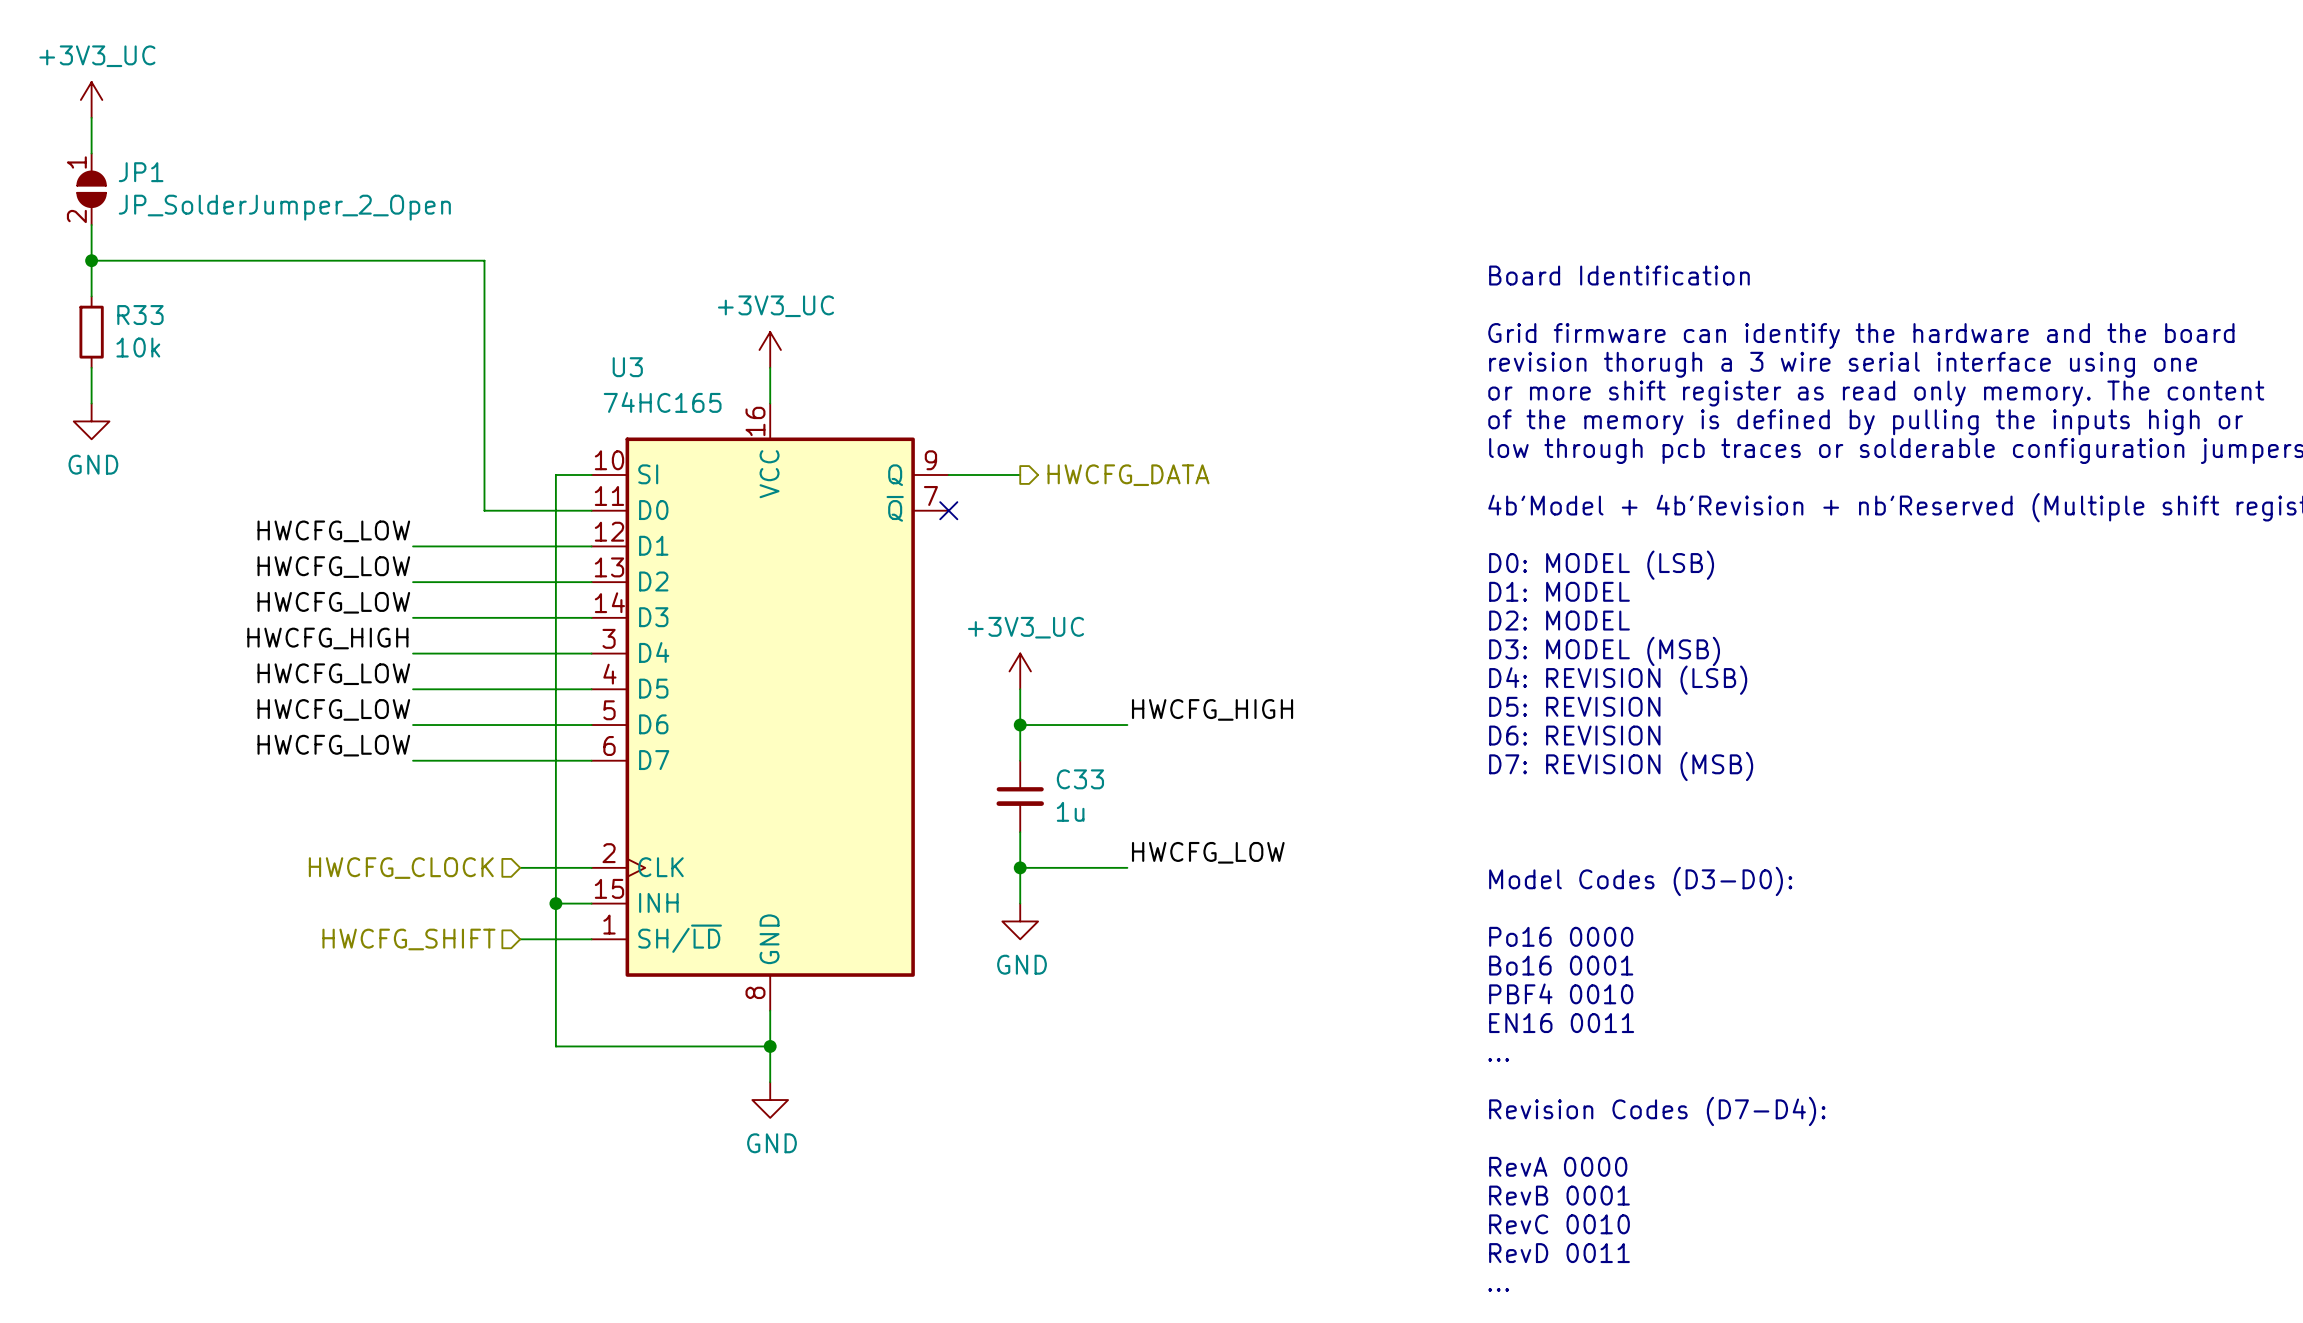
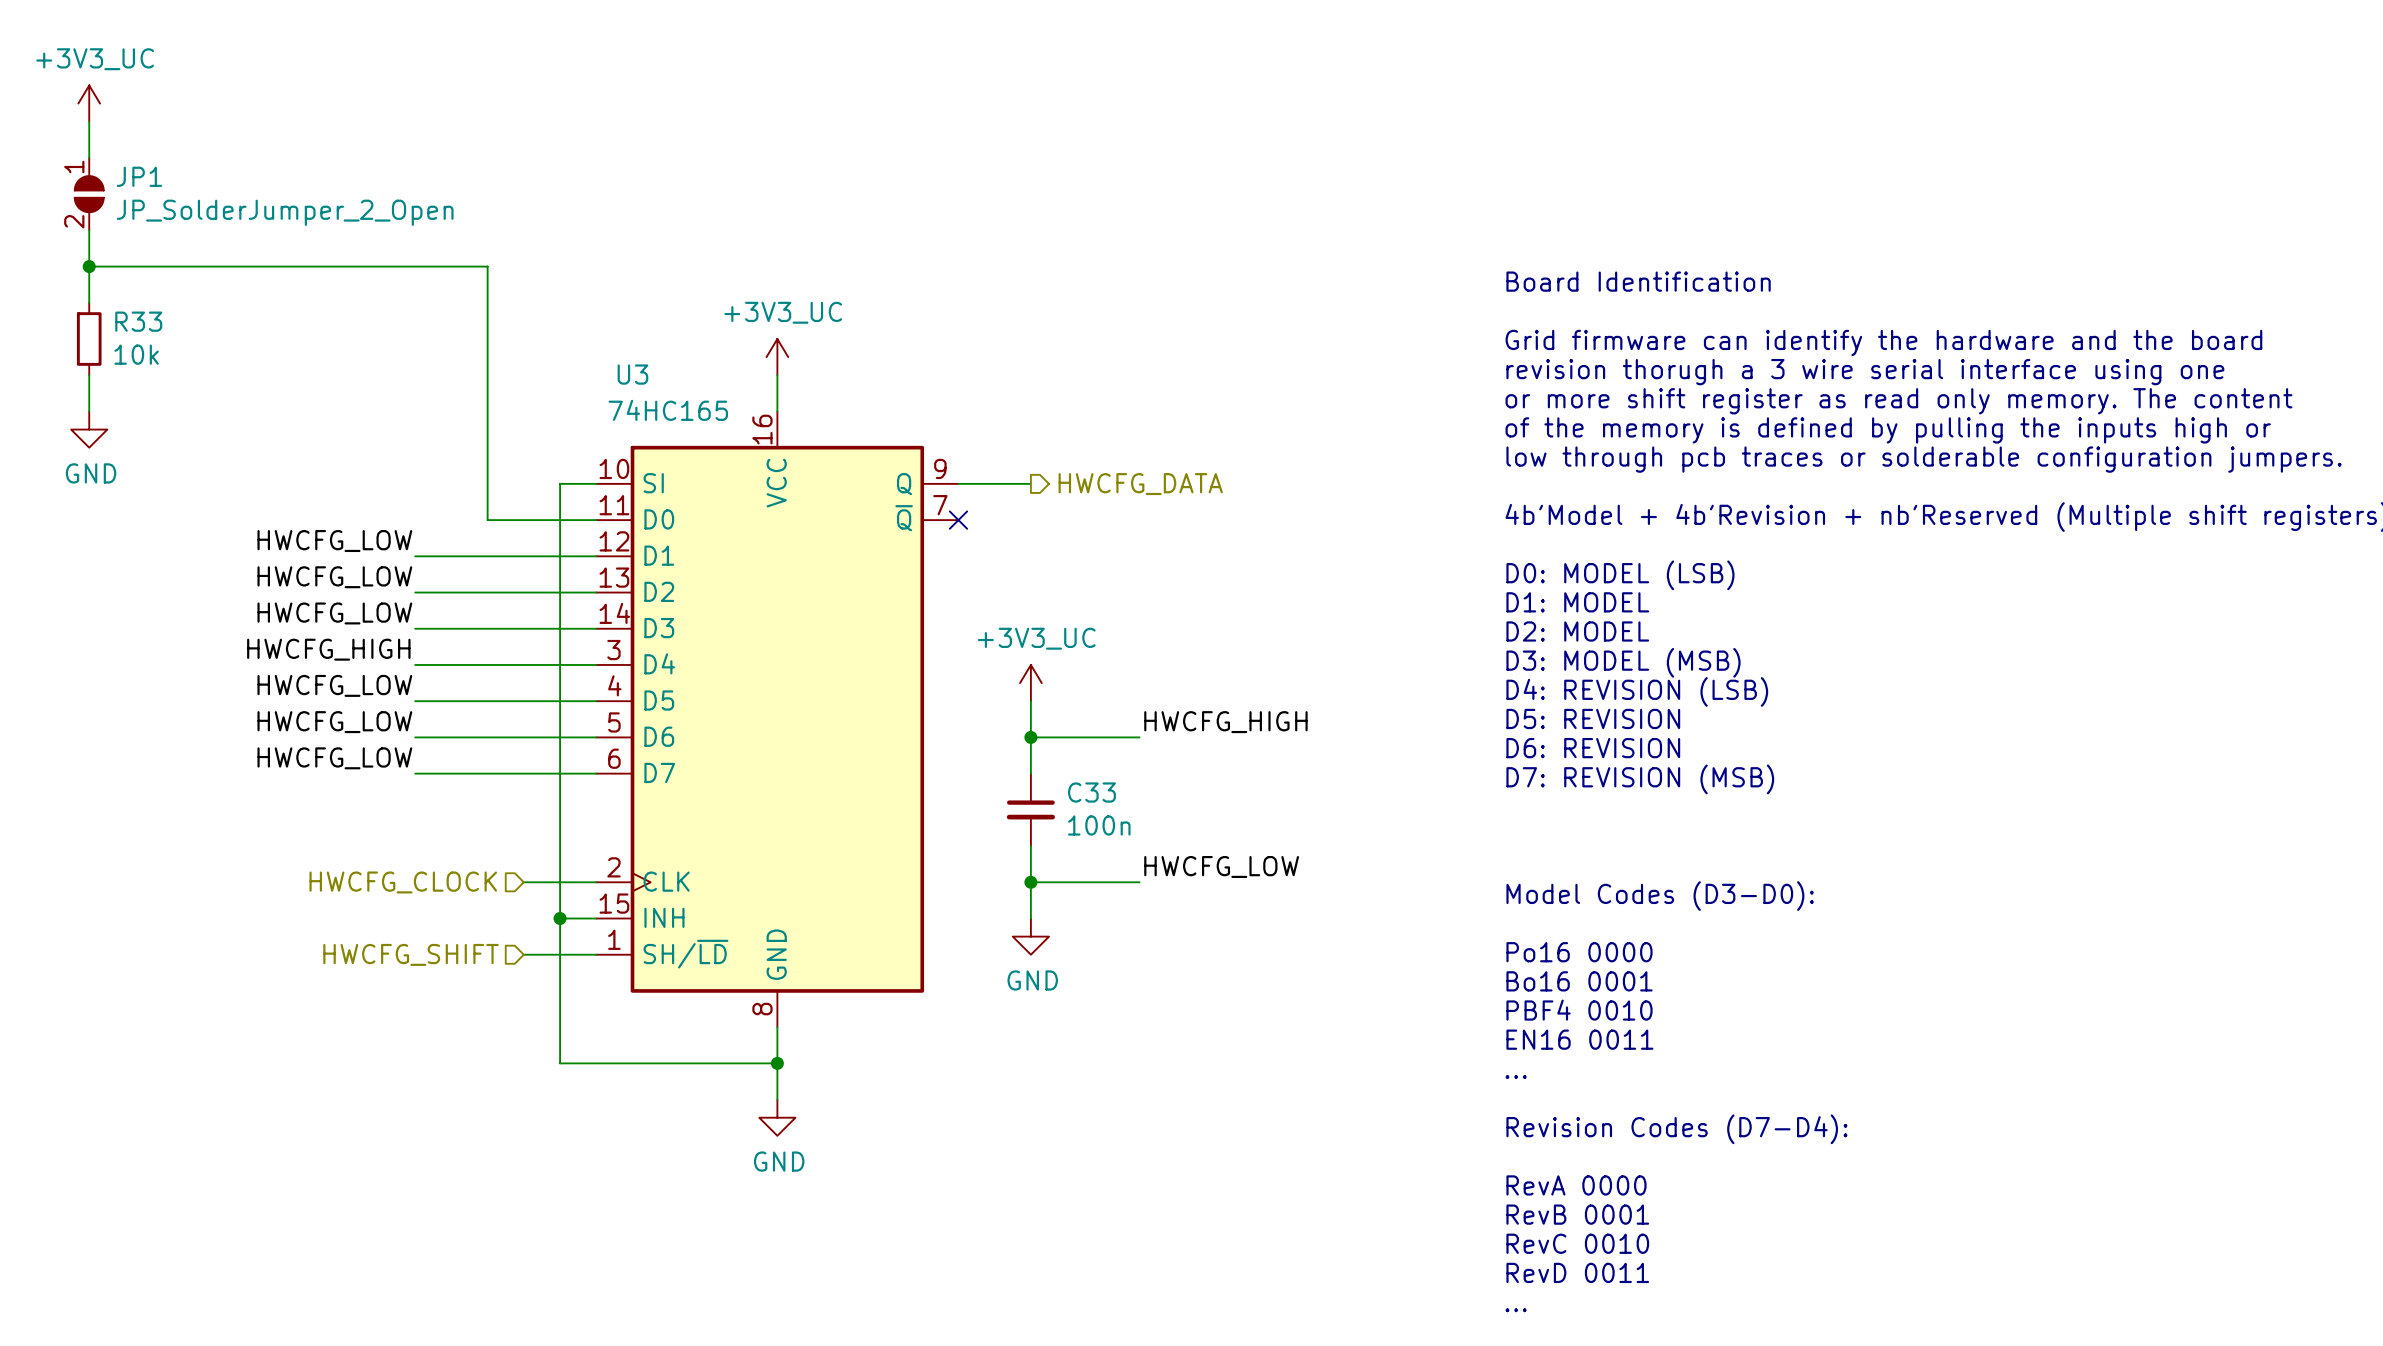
C33 value: 1u (1070, 811) -> 100n (1099, 825)

